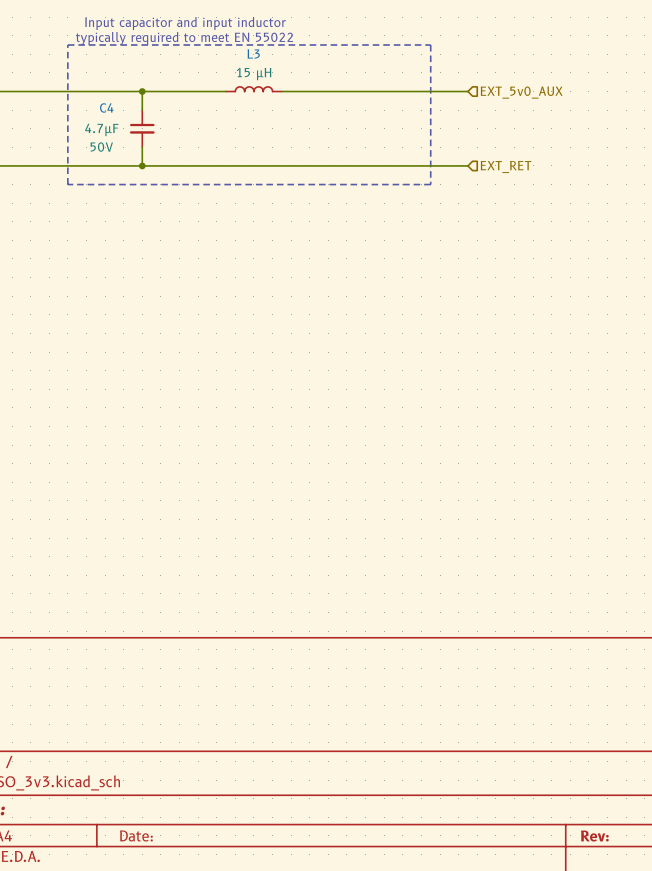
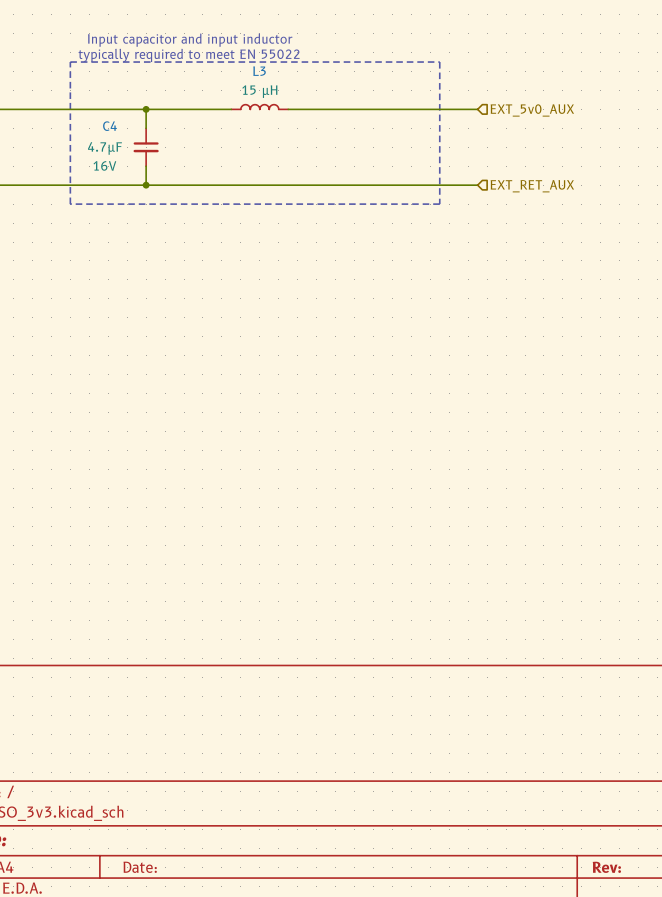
C4 text: 50V (101, 147) -> 16V (104, 165)
hierarchical label: EXT_RET (506, 166) -> EXT_RET_AUX (532, 186)

